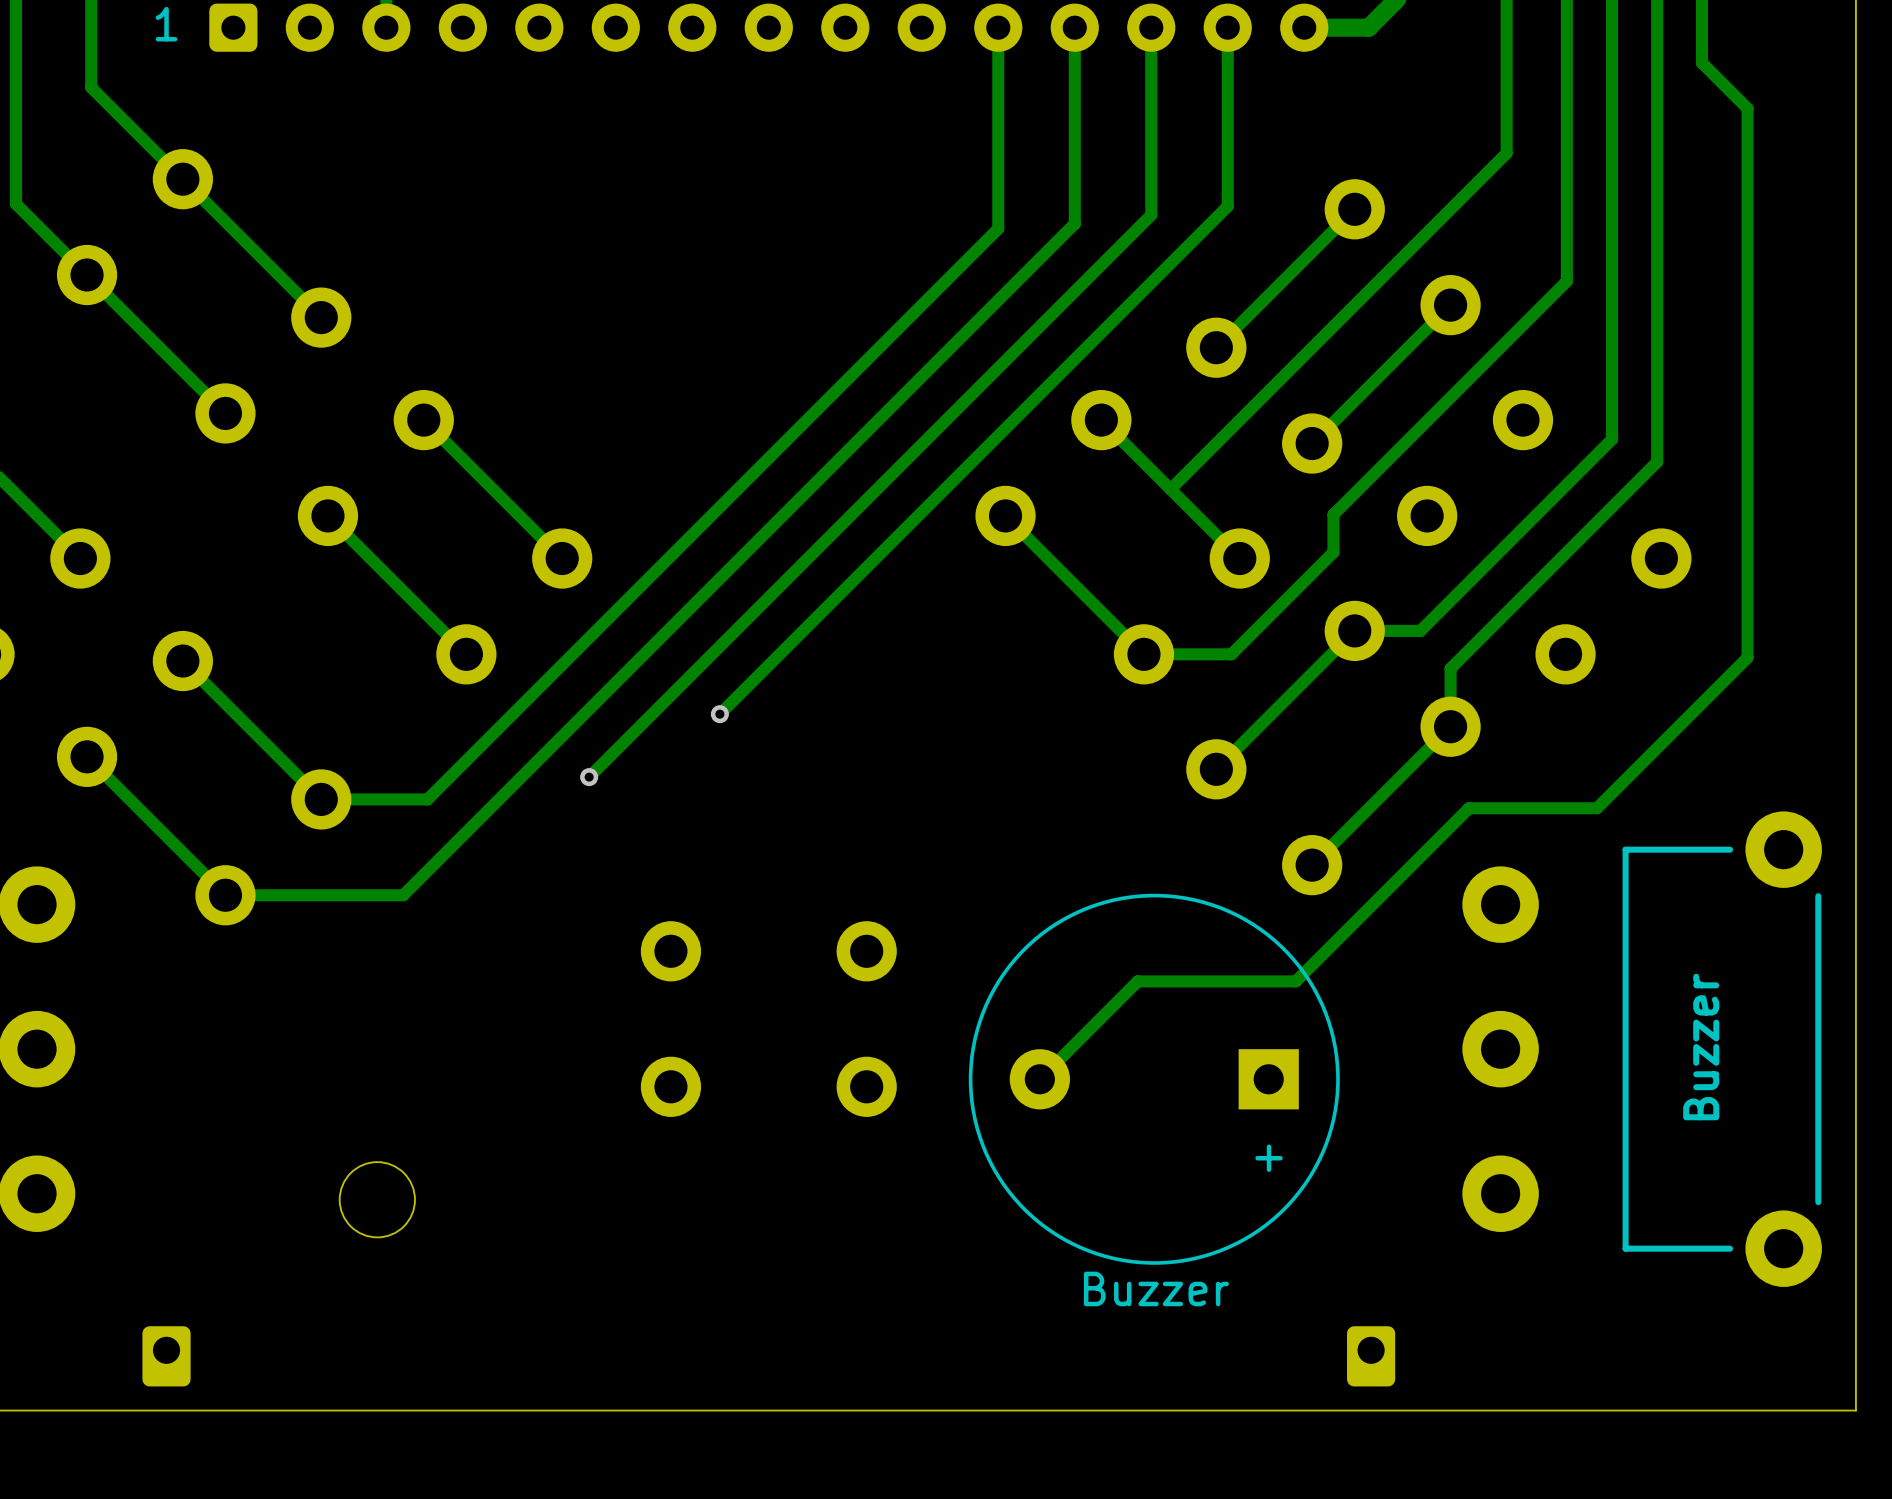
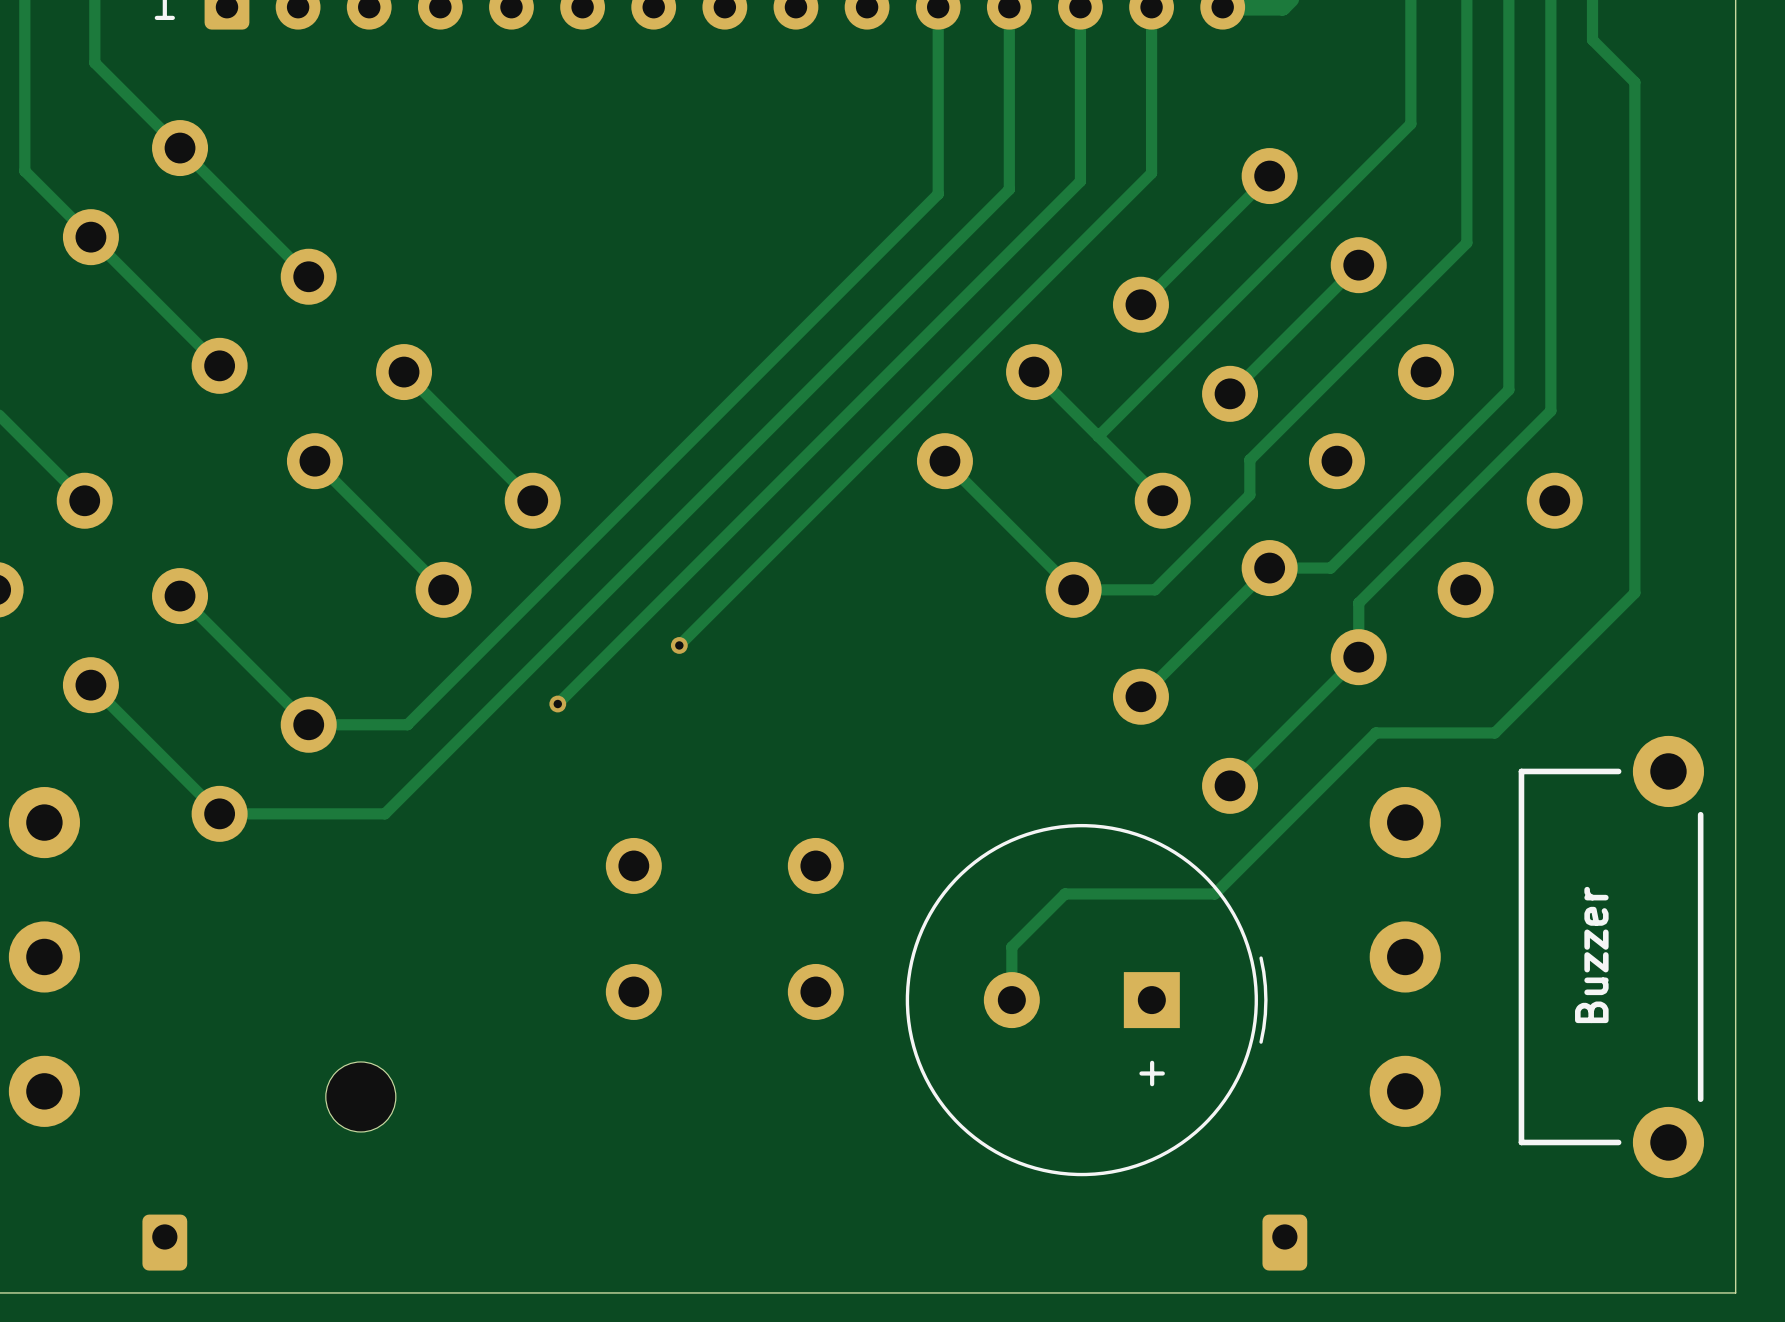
part footprint: [968, 893, 1340, 1265] -> [905, 823, 1268, 1177]
track: (1137, 981) (1039, 1079) -> (1067, 893) (1064, 893) (1011, 947) (1011, 1000)
part value: Buzzer (1156, 1288) -> none

